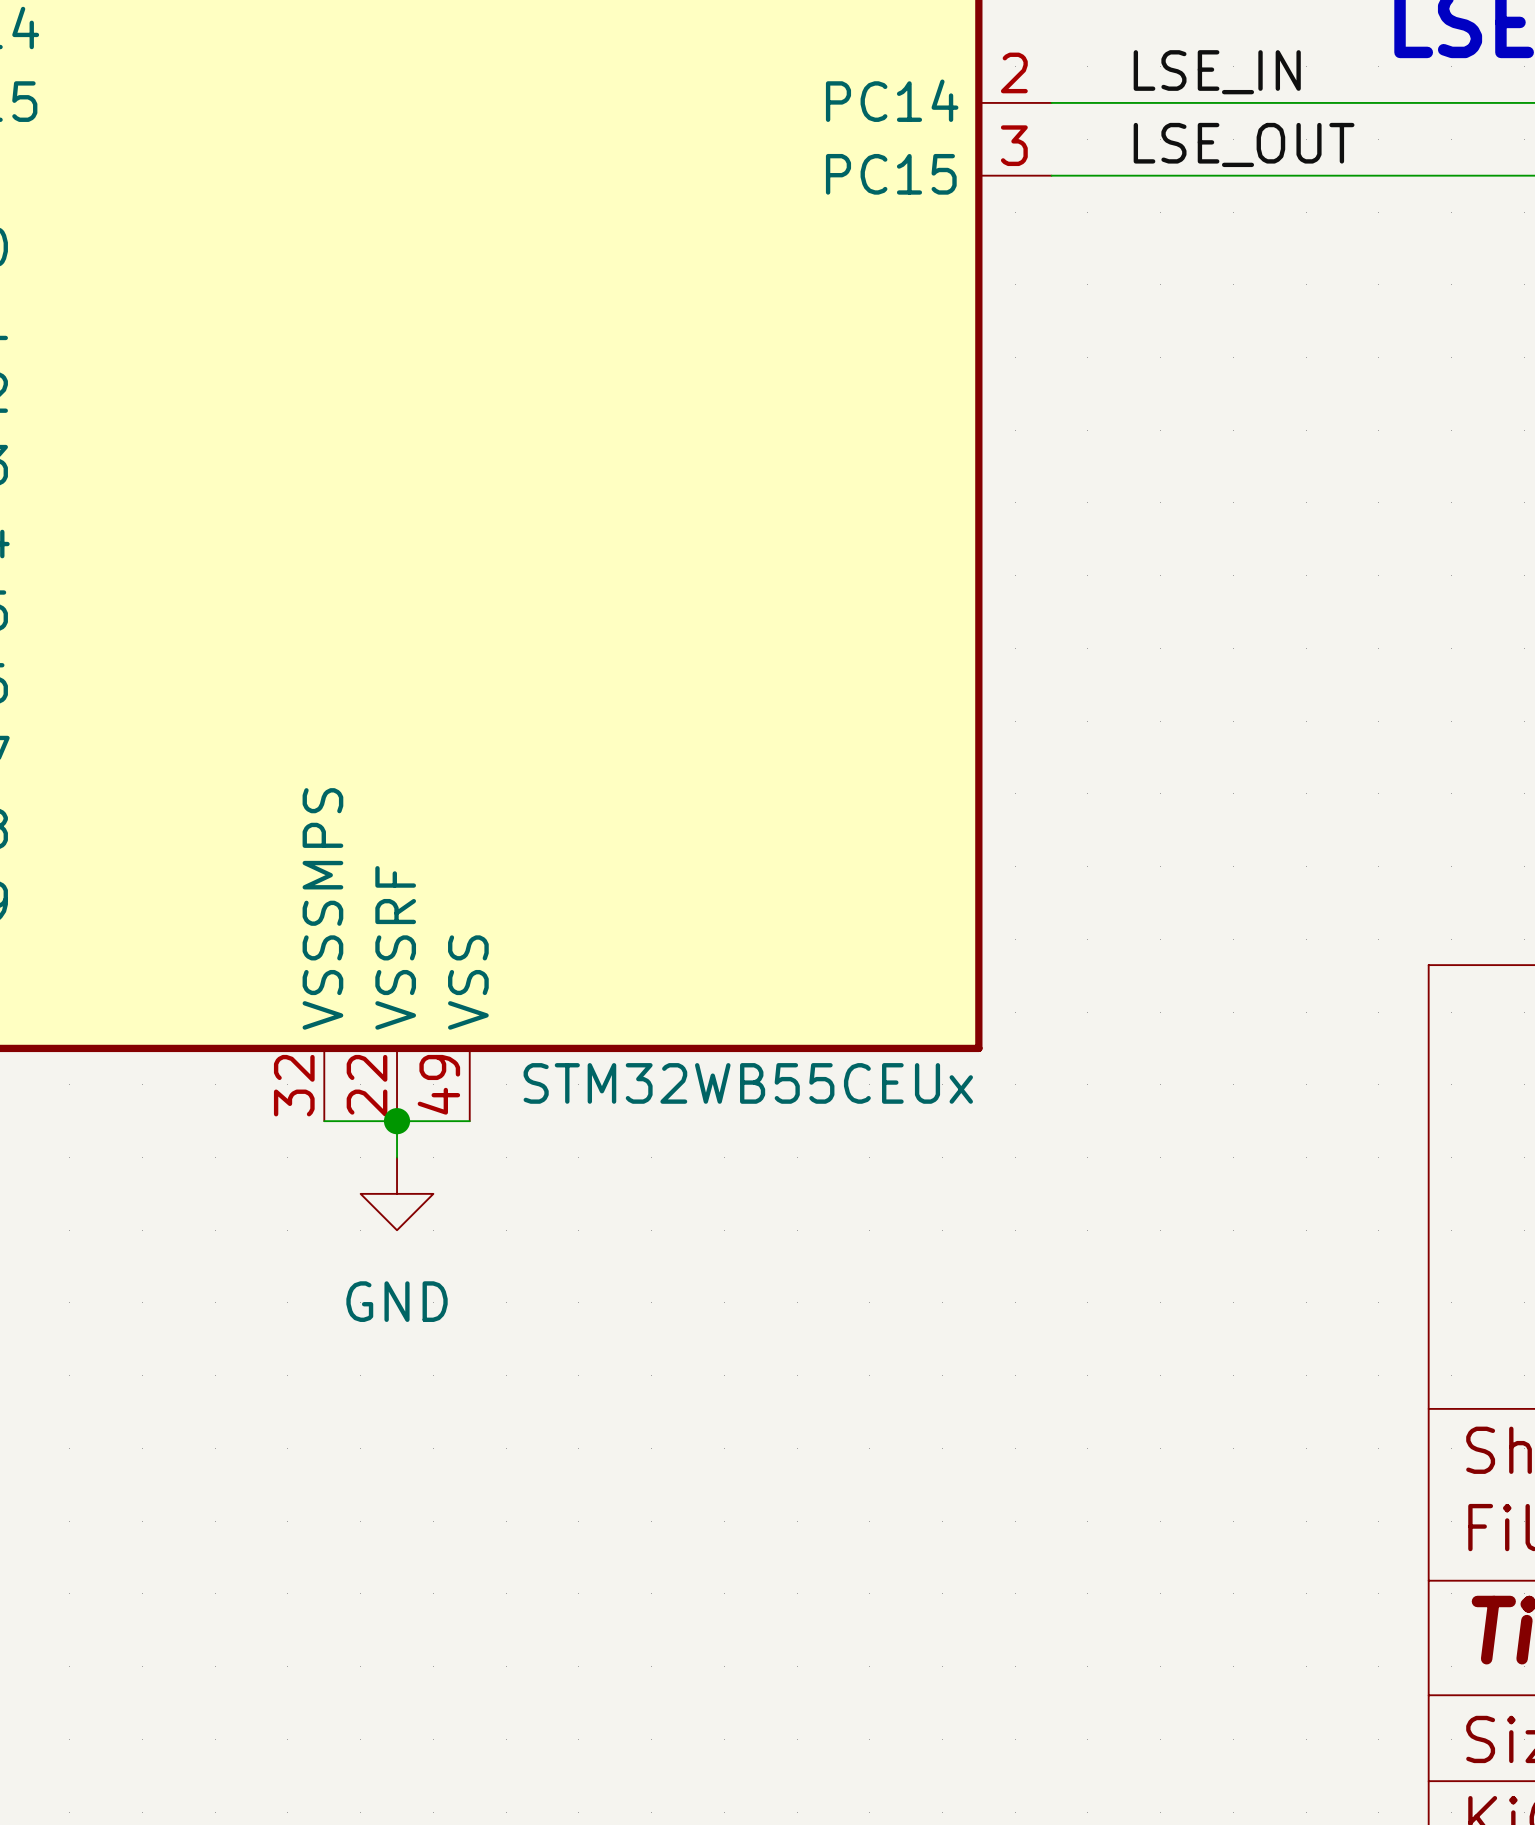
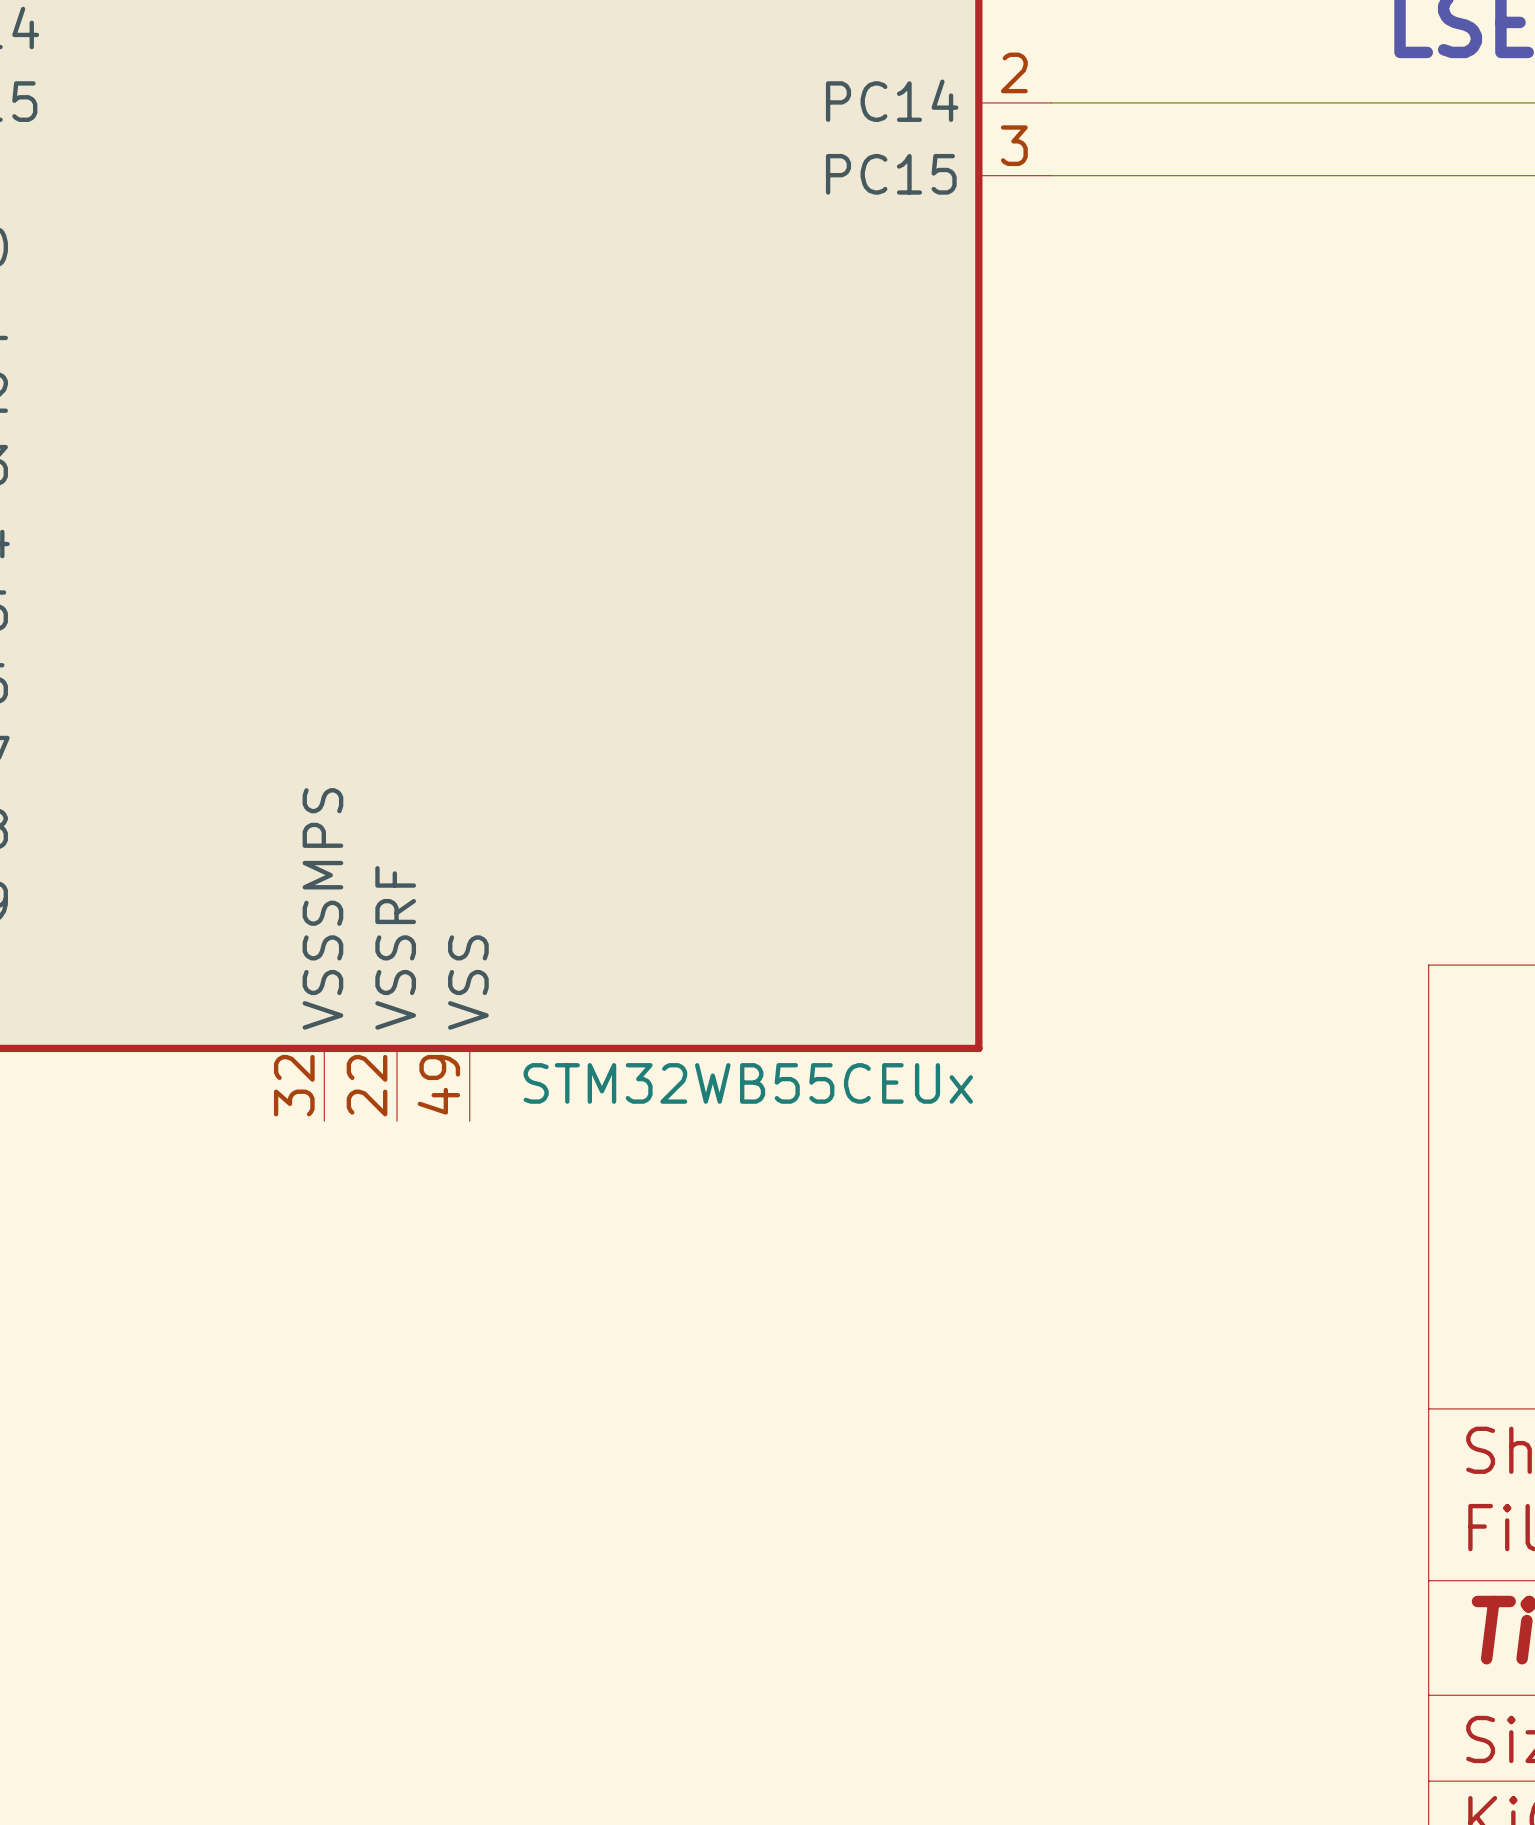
label: LSE_IN (1217, 72) -> none
label: LSE_OUT (1244, 144) -> none
wire: (324, 1121) (469, 1121) -> none
wire: (397, 1121) (397, 1157) -> none
junction: (397, 1121) -> none
power symbol: GND (397, 1193) -> none

